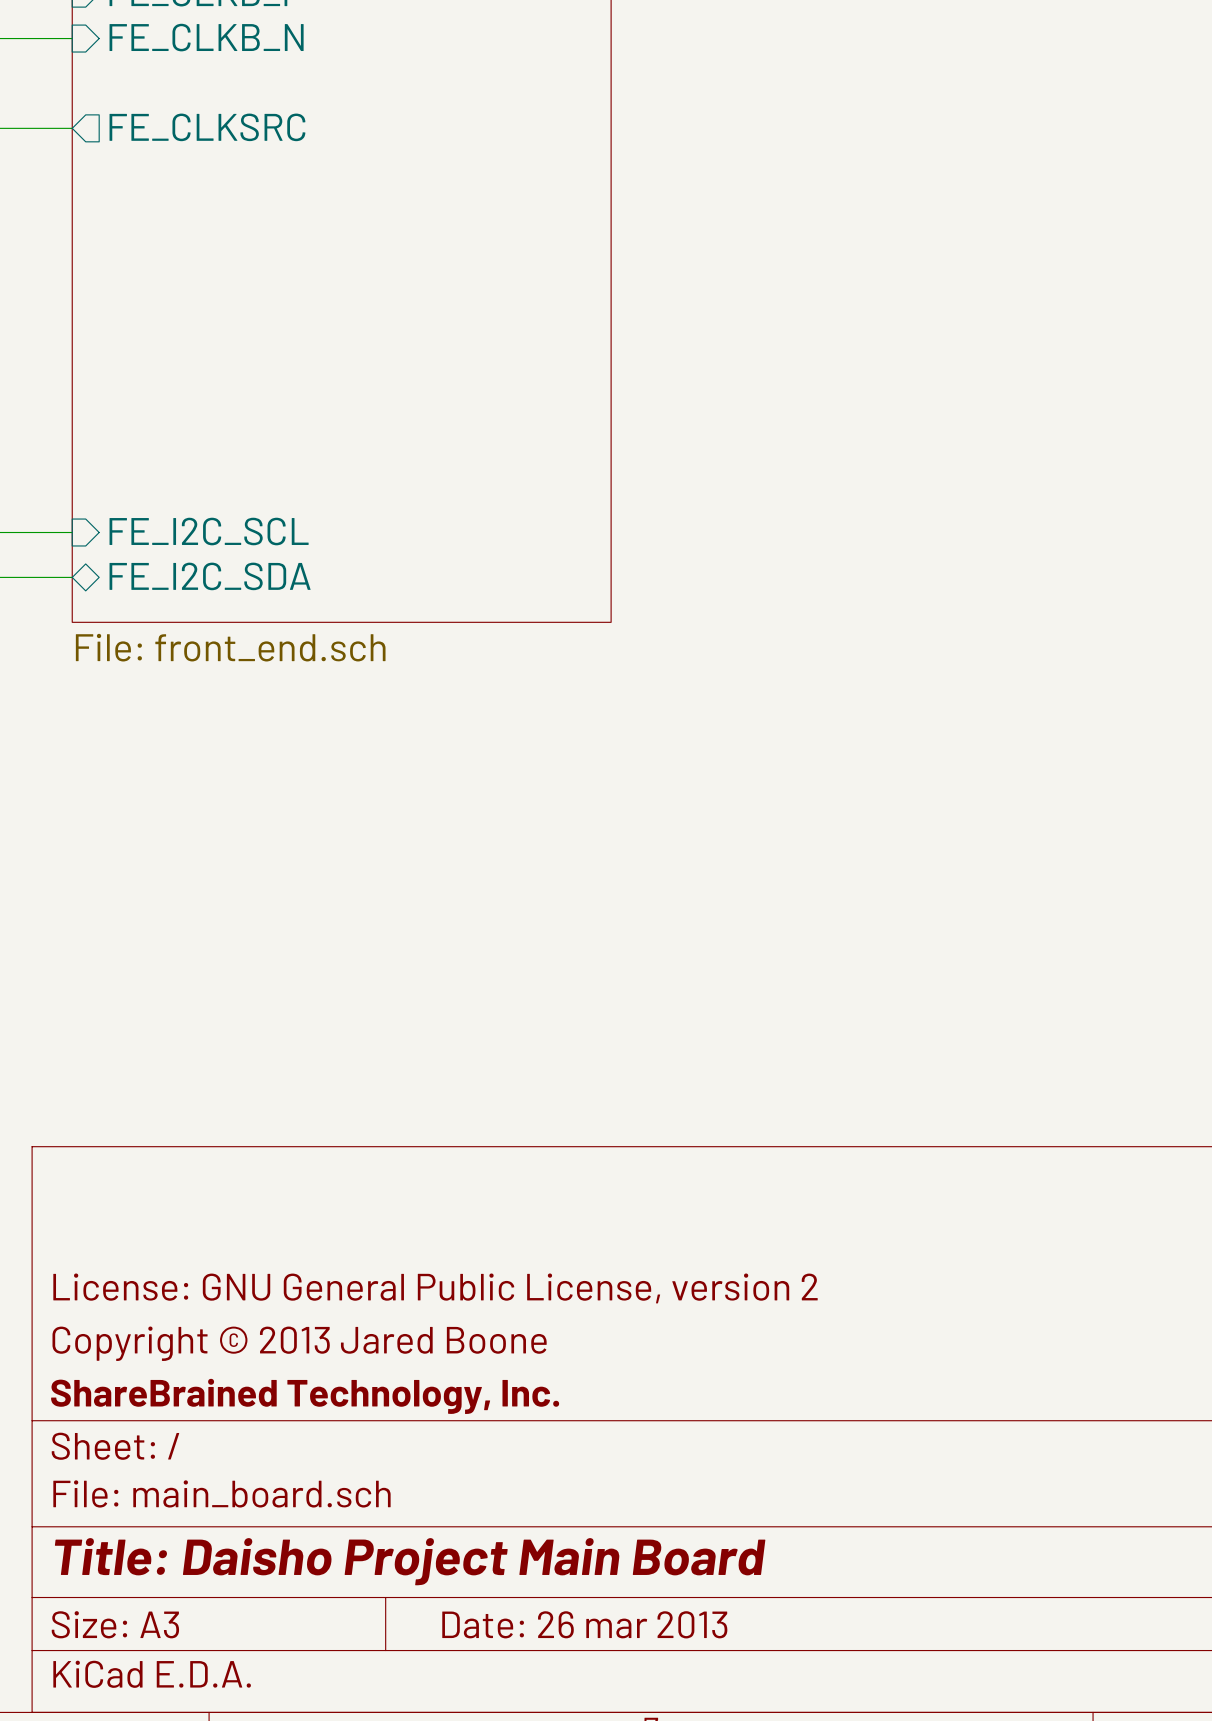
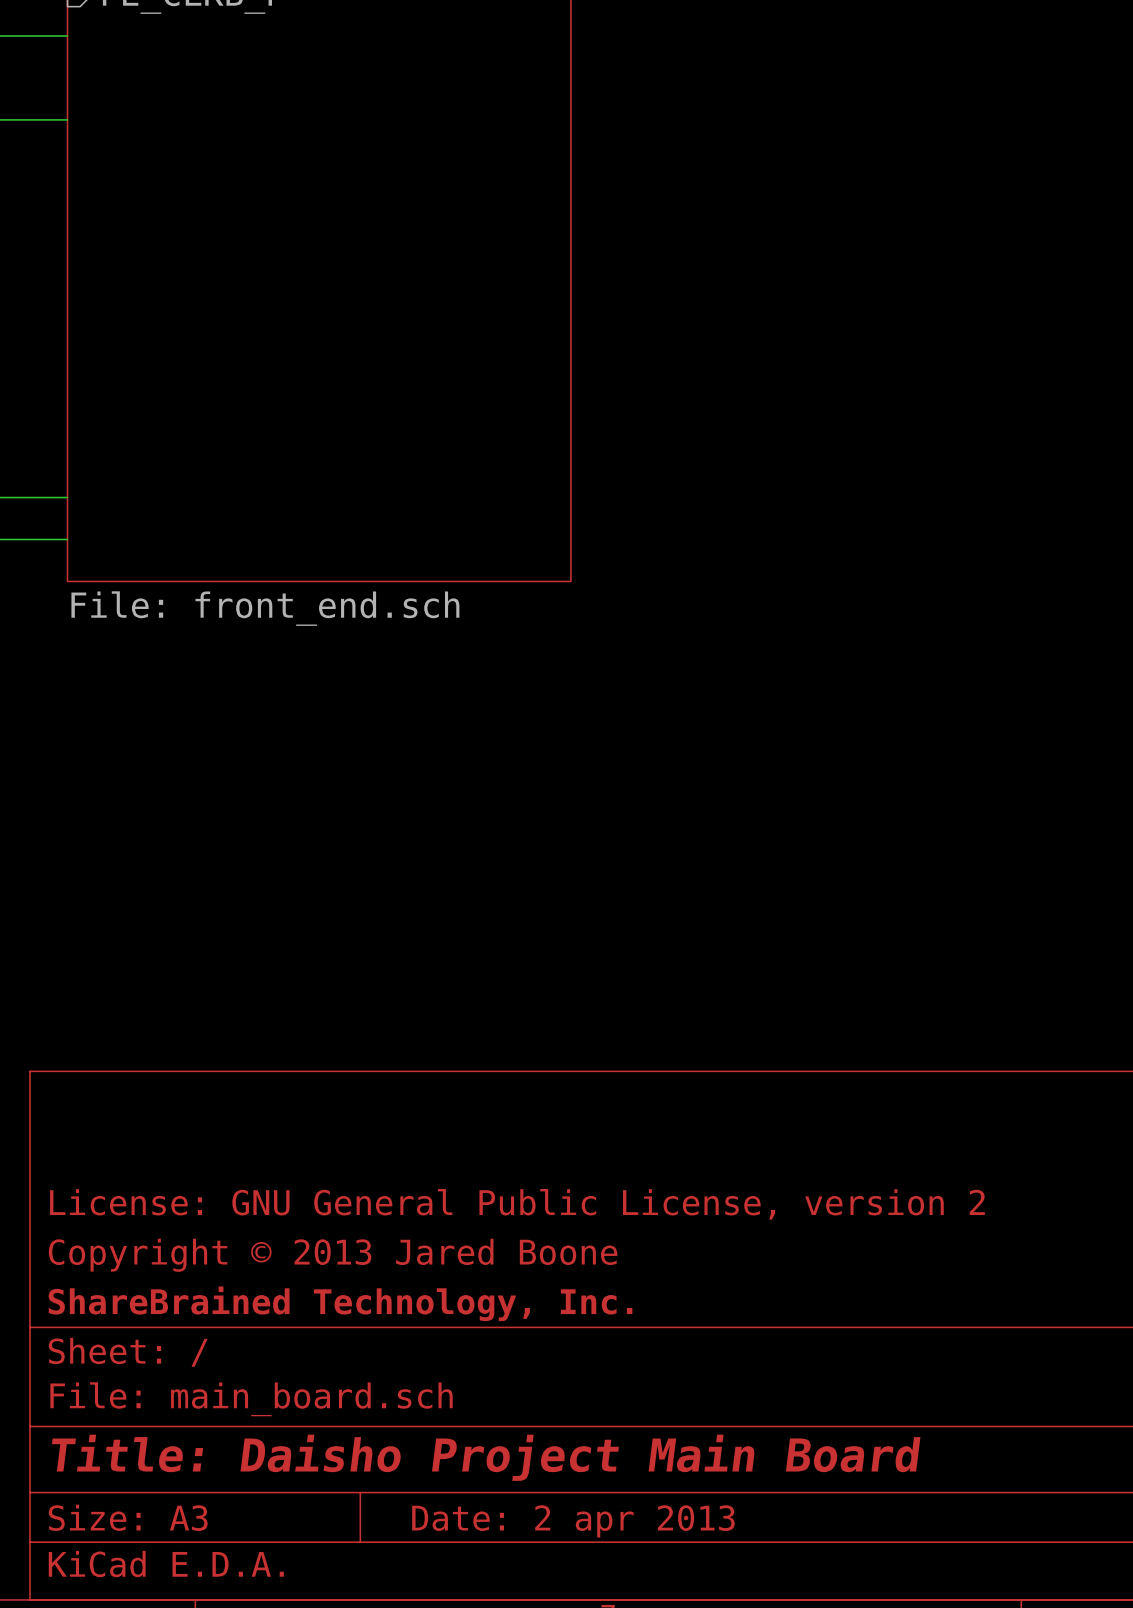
sheet pin: FE_CLKB_N (206, 37) -> none
sheet pin: FE_CLKSRC (207, 127) -> none
sheet pin: FE_I2C_SCL (209, 531) -> none
sheet pin: FE_I2C_SDA (210, 576) -> none
title block: Date: 26 mar 2013 (584, 1624) -> Date: 2 apr 2013 (573, 1521)

